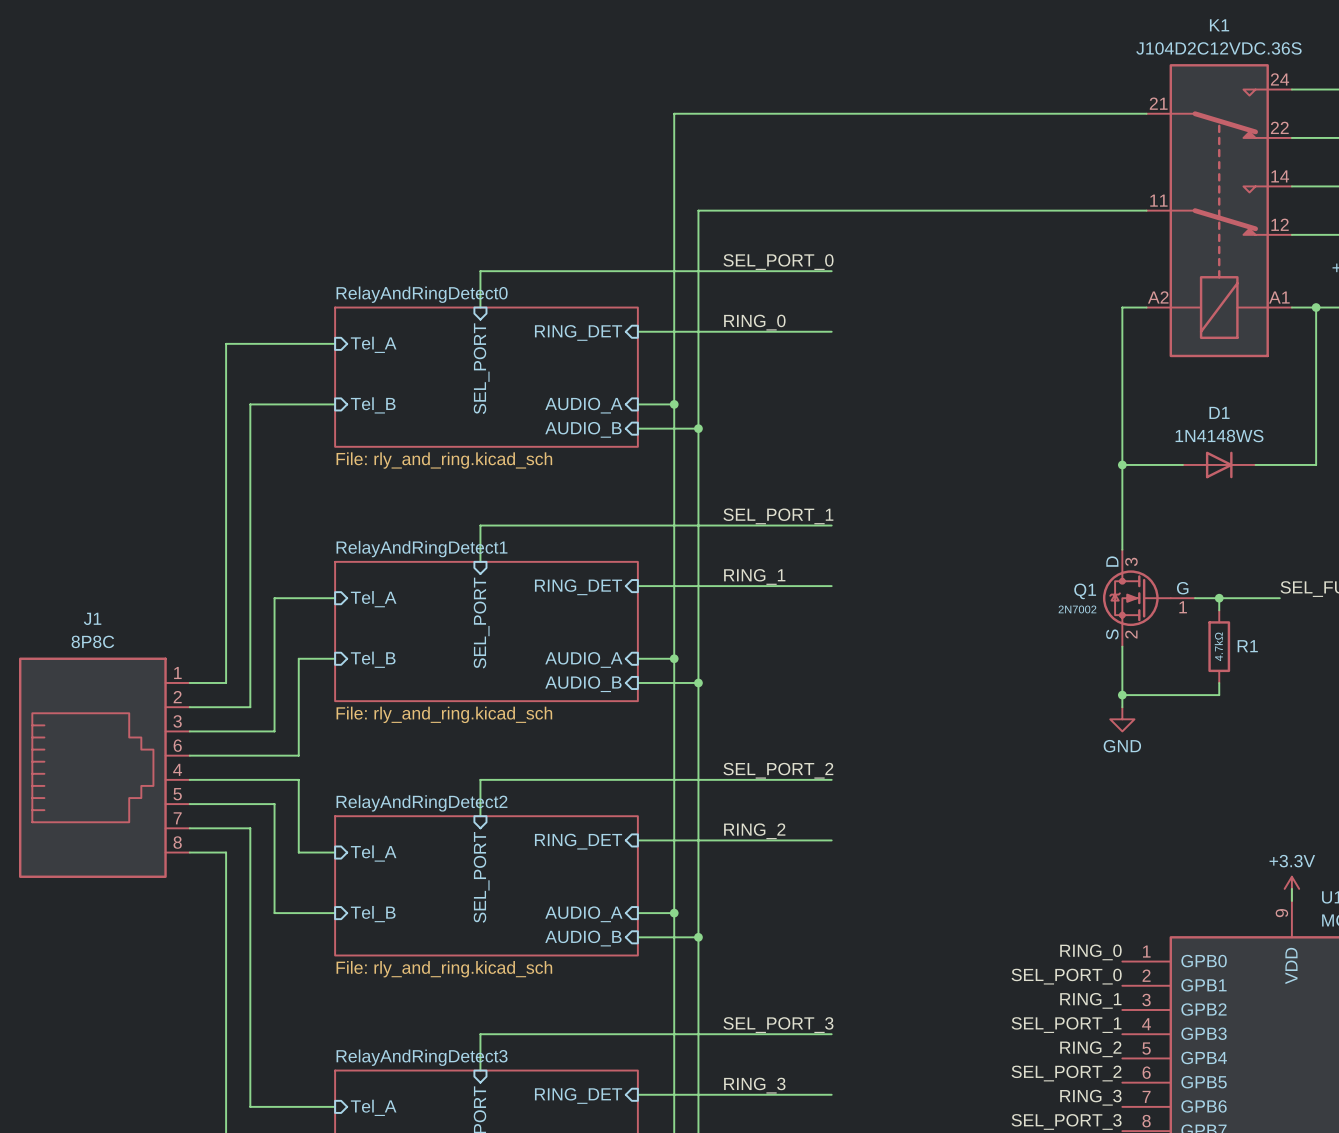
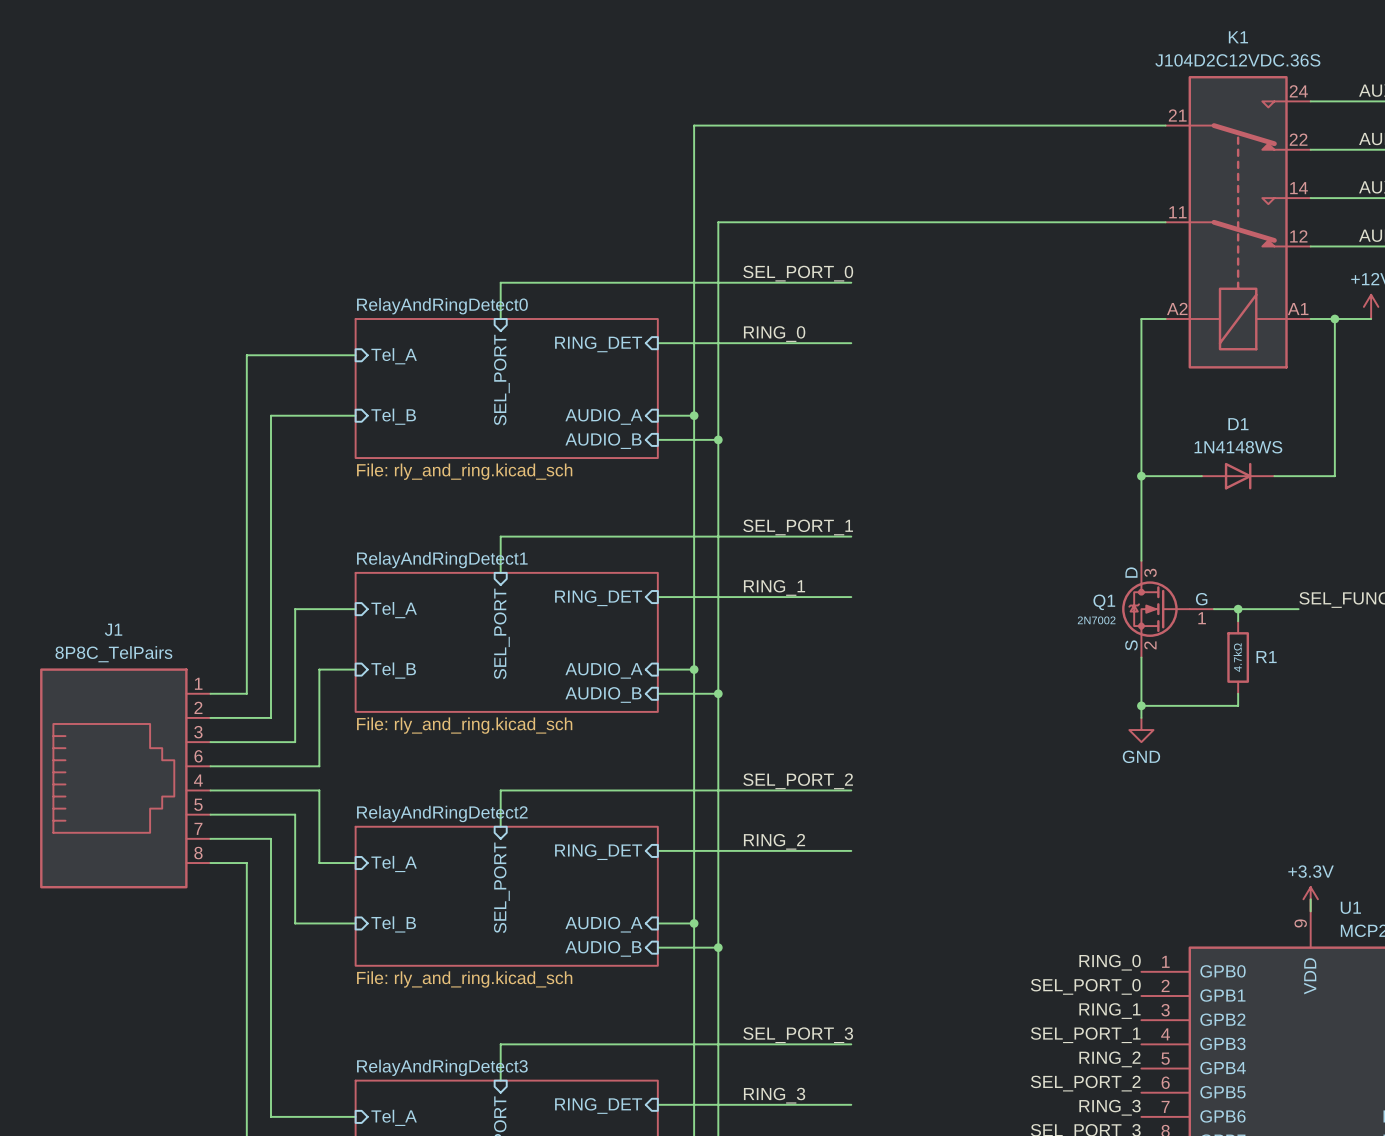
J1 value: 8P8C (92, 641) -> 8P8C_TelPairs (113, 654)

